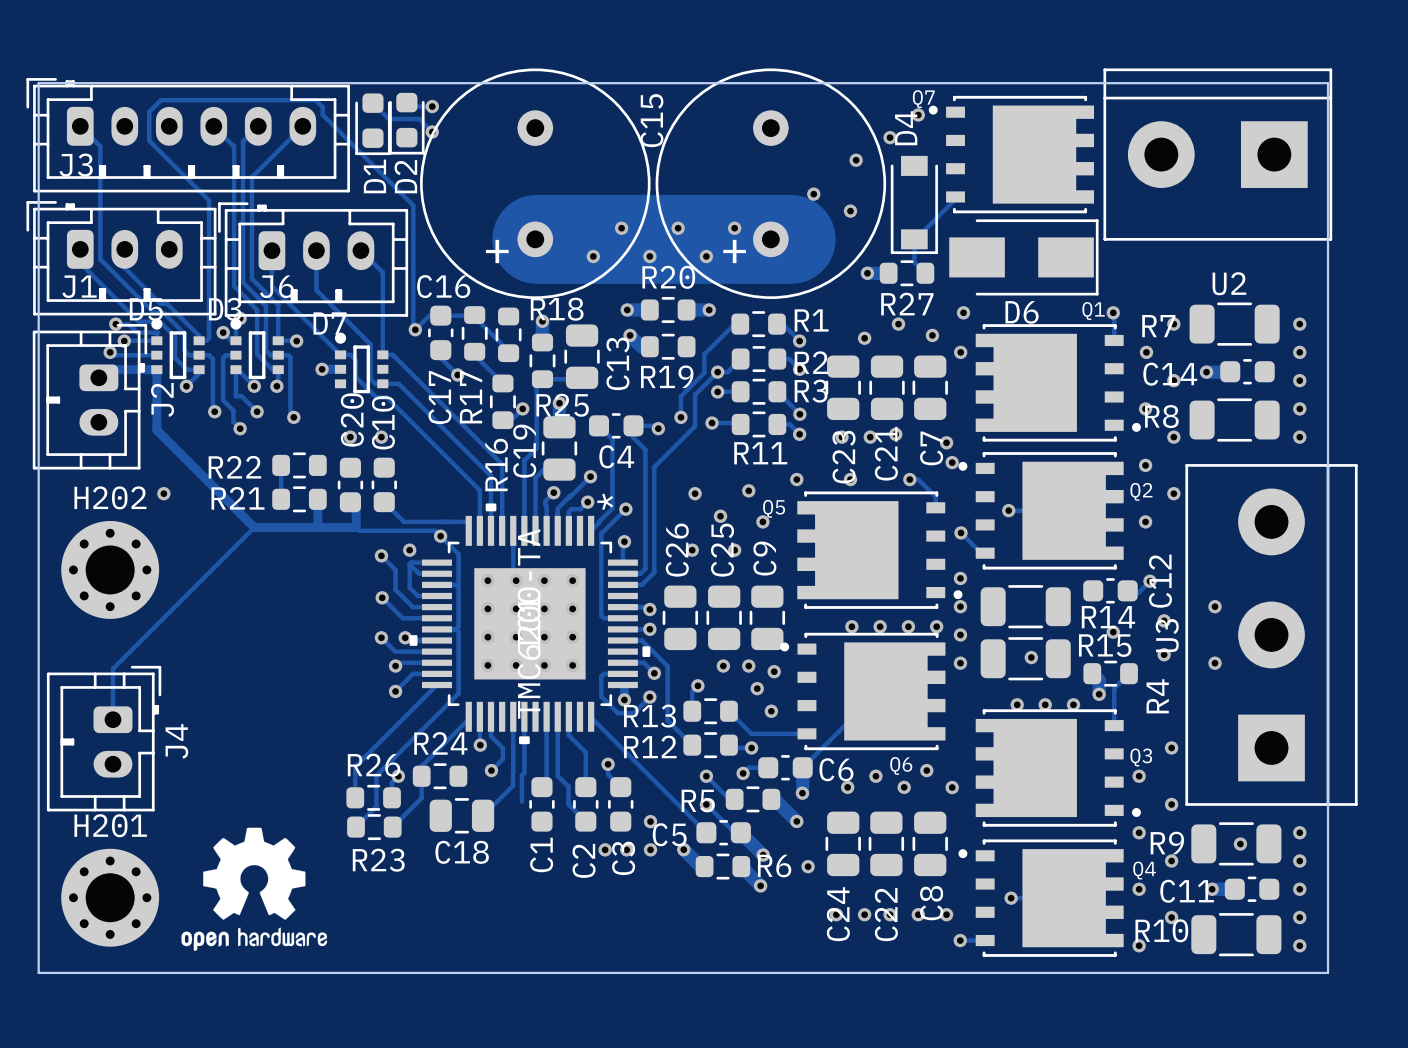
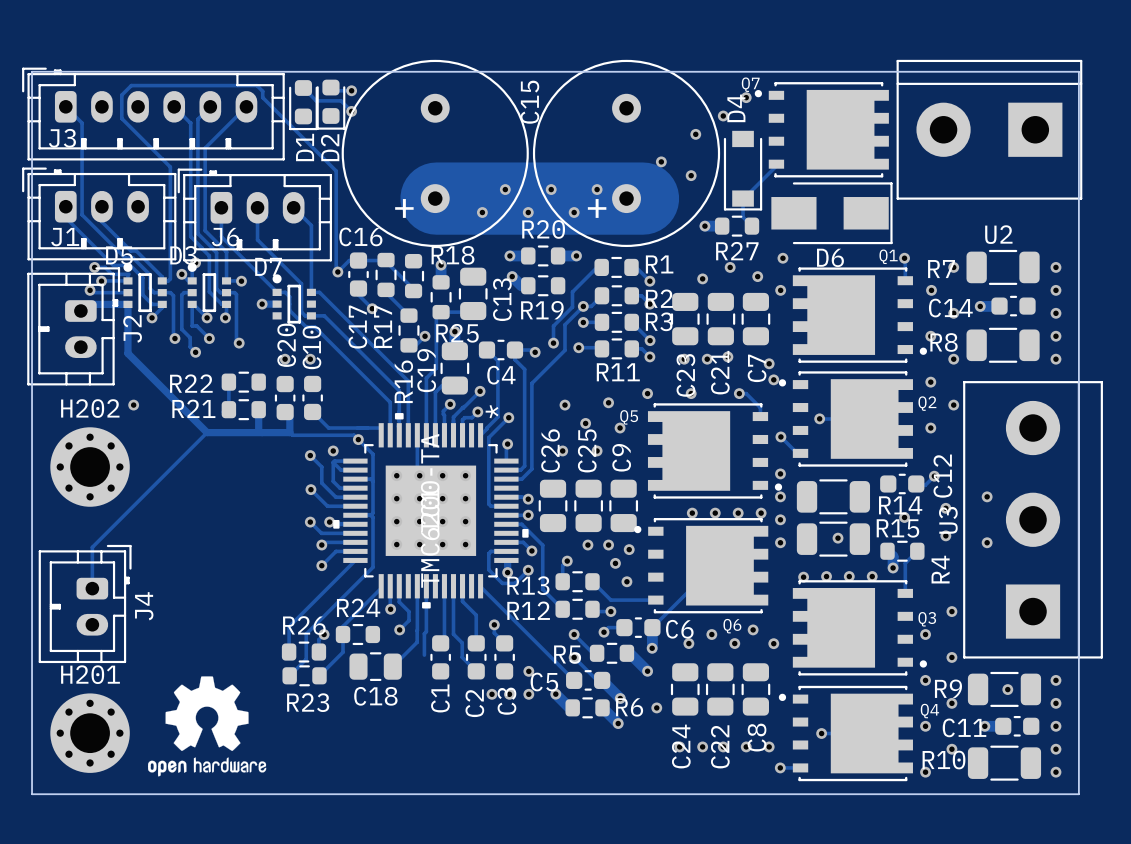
via: none -> (803, 577)

